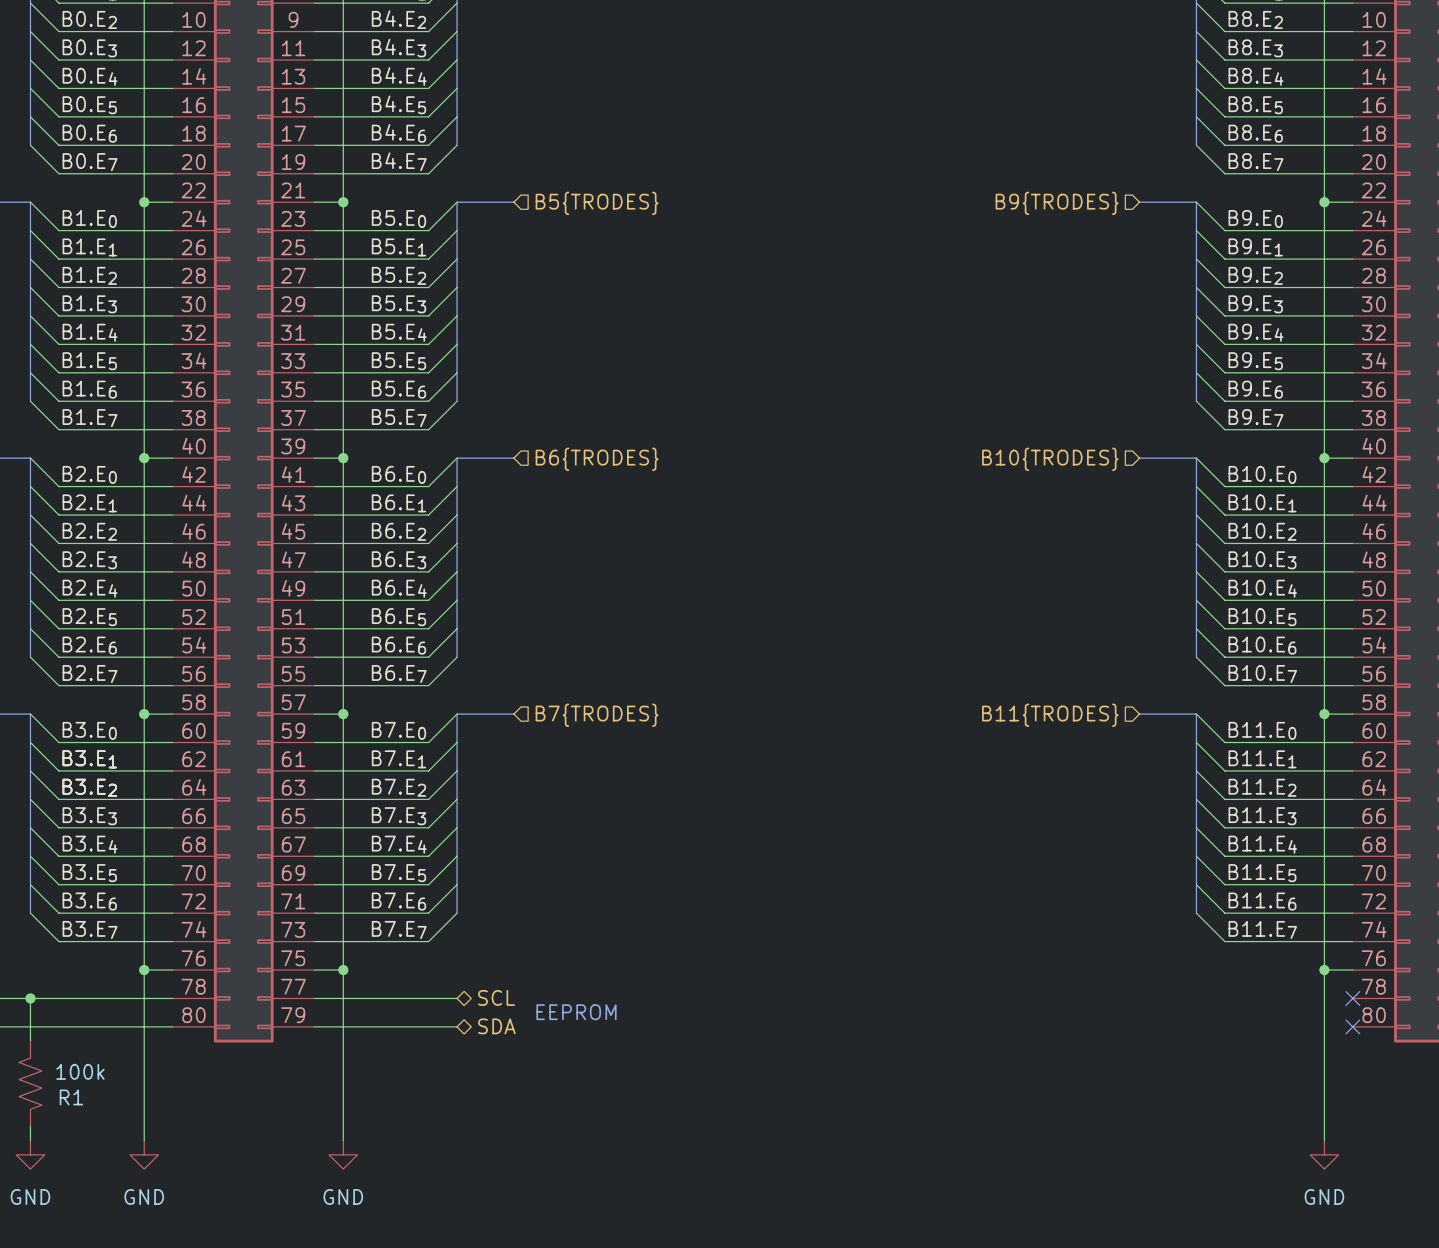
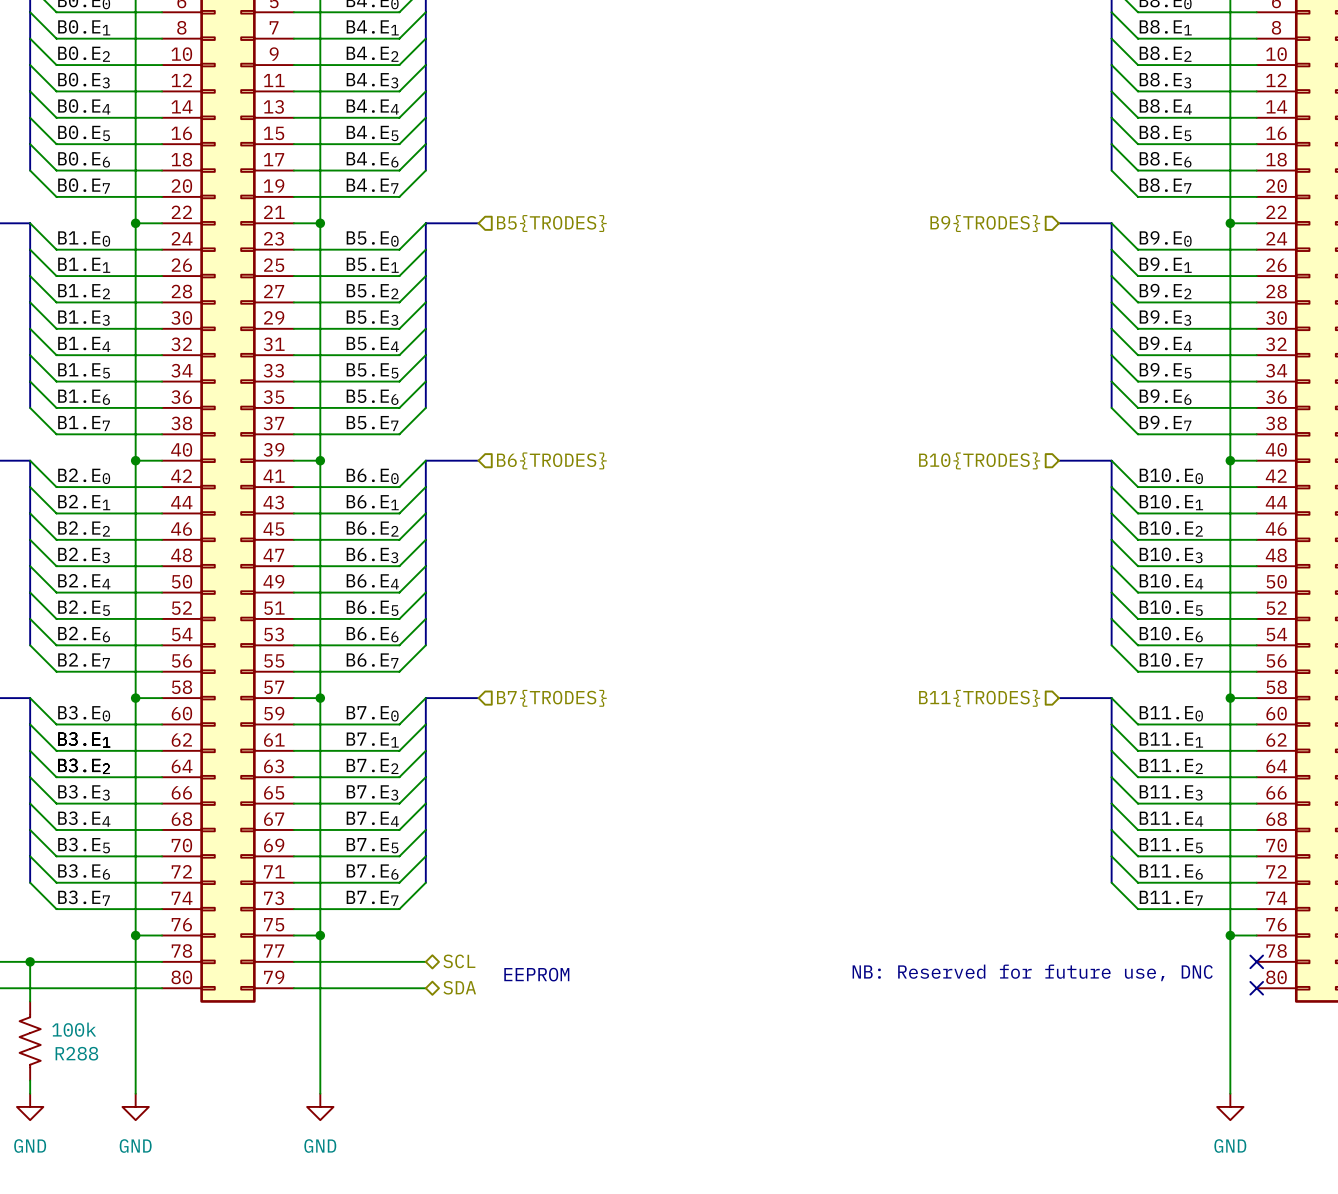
text: none -> NB: Reserved for future use, DNC (1032, 972)
R1 name: R1 (71, 1097) -> R288 (76, 1053)

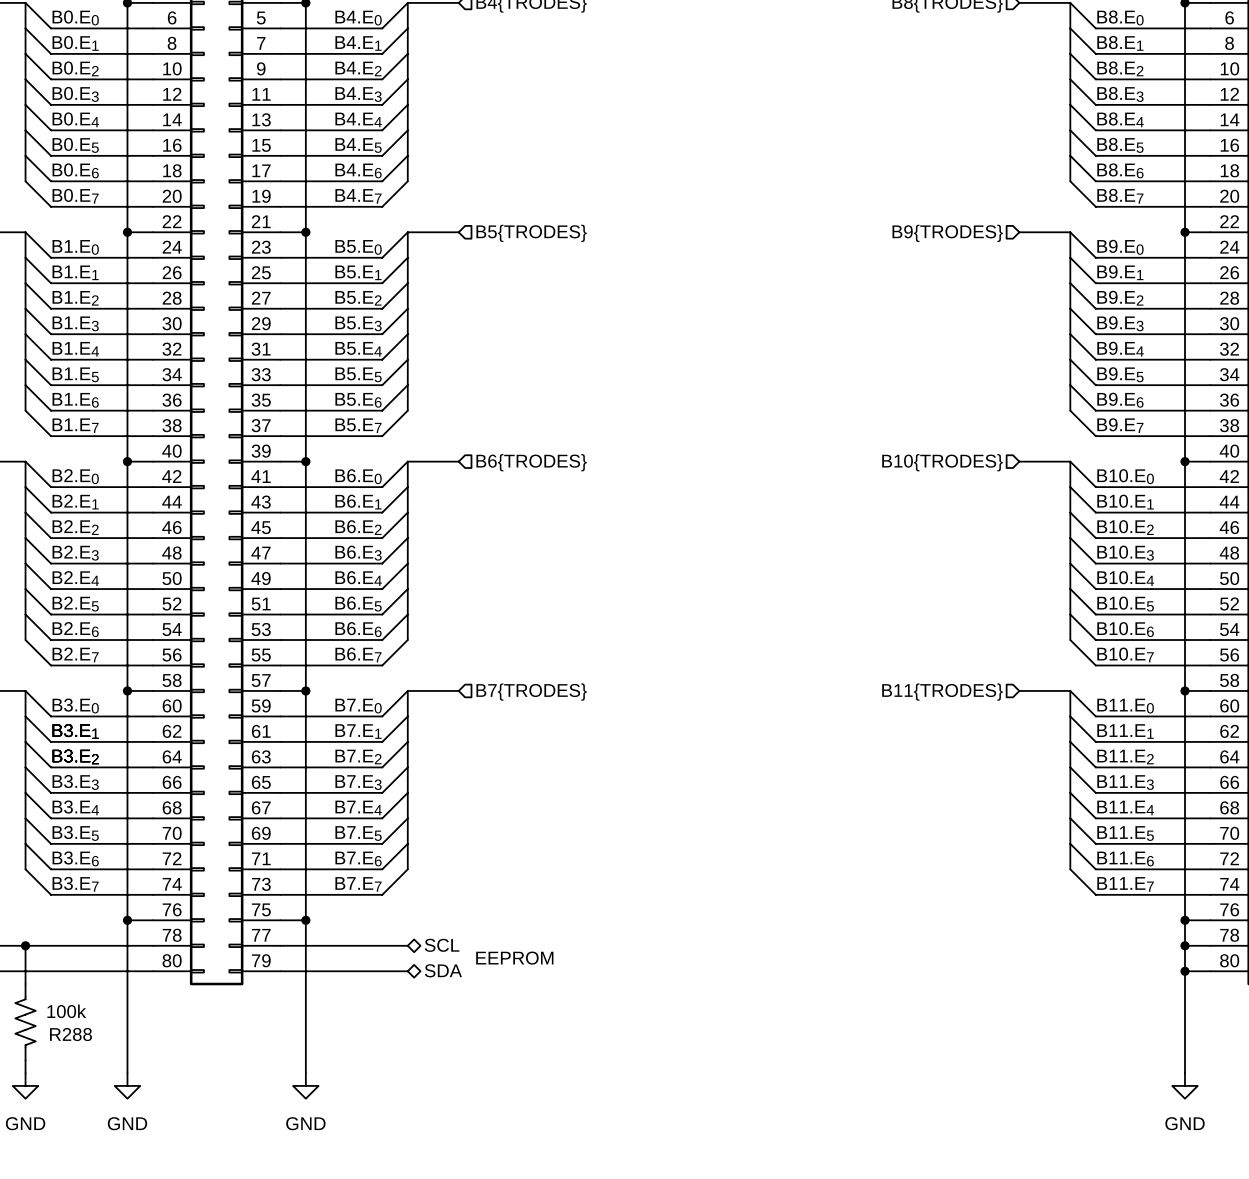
wire: none -> (1185, 945) (1210, 945)
junction: none -> (1185, 945)
no-connect mark: (1256, 961) -> none
text: NB: Reserved for future use, DNC (1032, 972) -> none
wire: none -> (1185, 971) (1210, 971)
junction: none -> (1185, 971)
no-connect mark: (1256, 988) -> none

